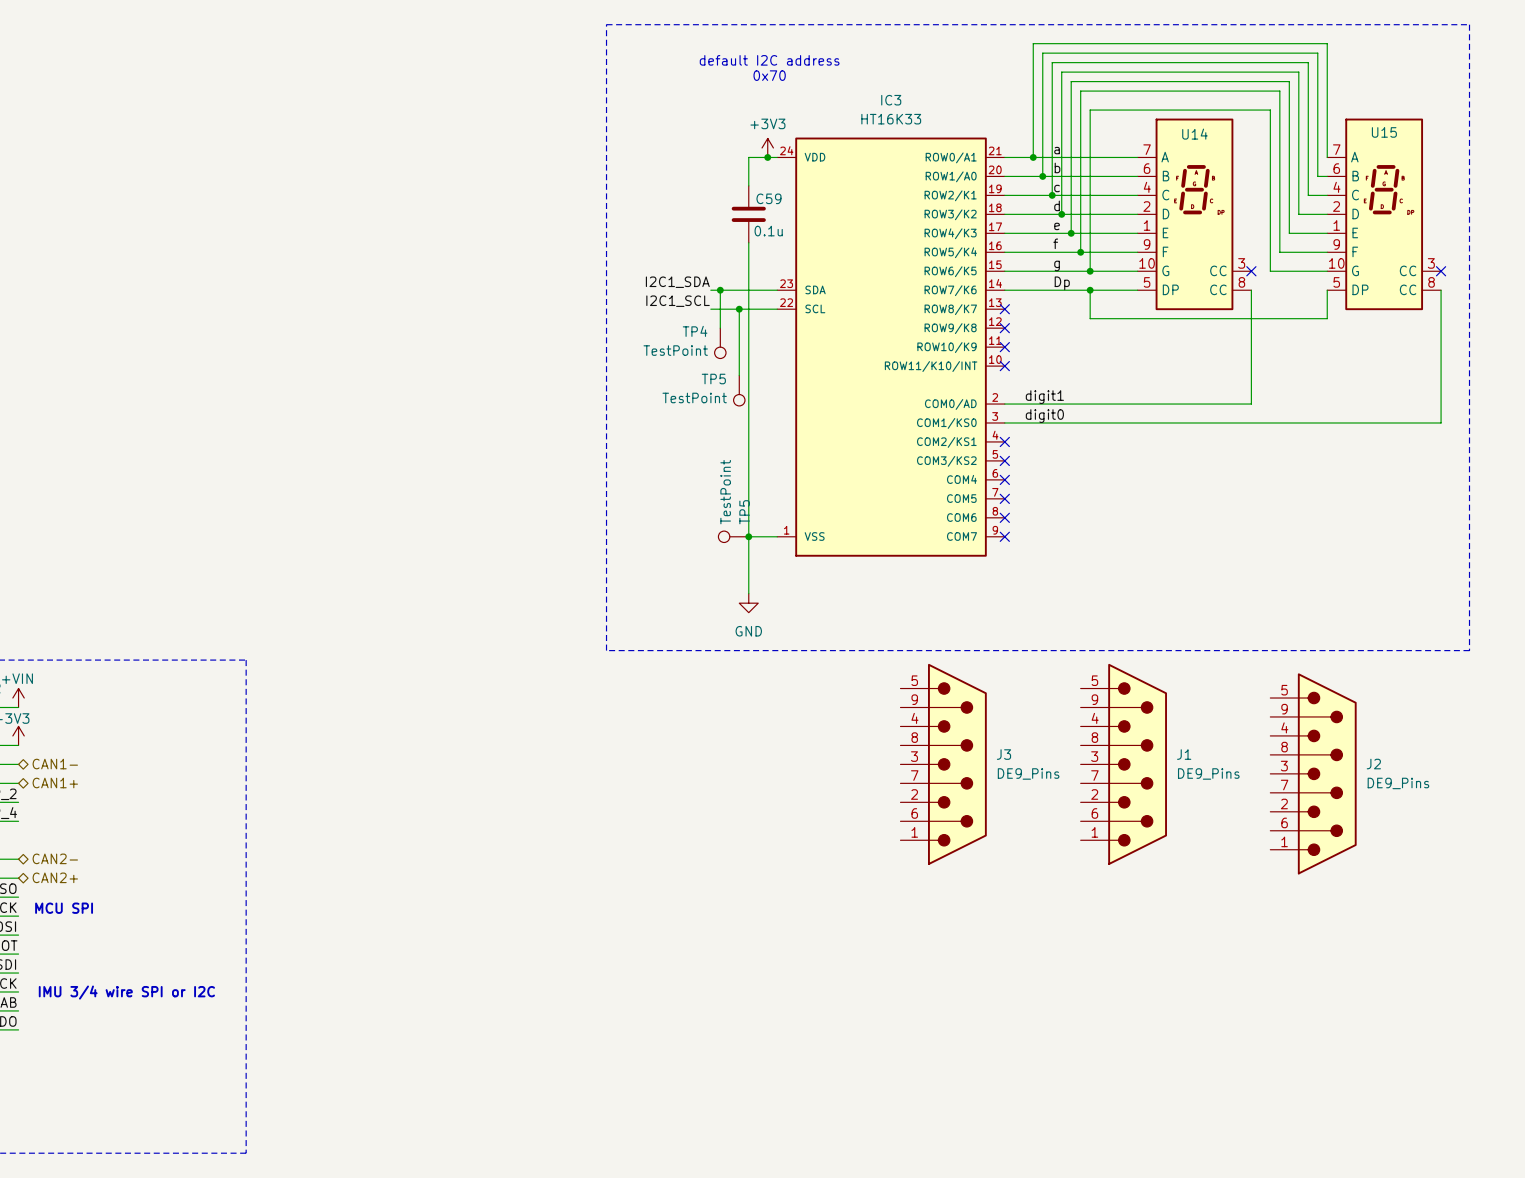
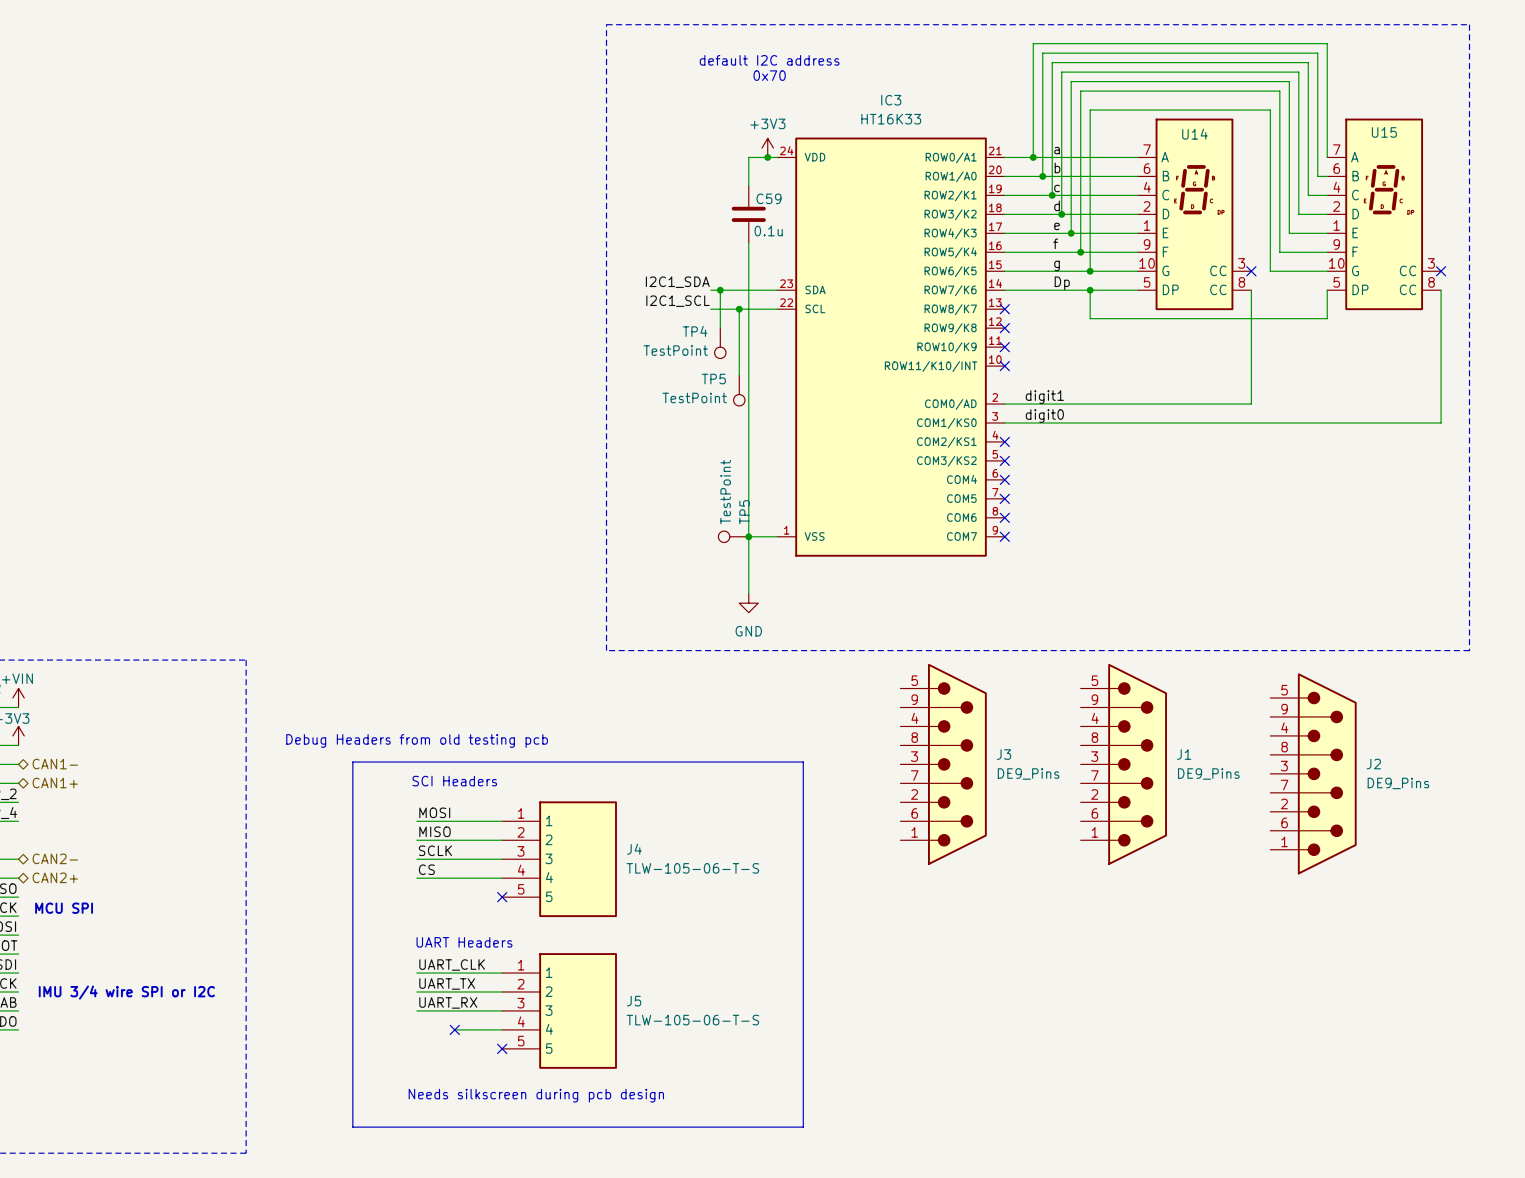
text: none -> Debug Headers from old testing pcb (417, 740)
line: none -> (352, 762) (803, 762) (803, 1127) (352, 1127) (352, 762)
text: none -> SCI Headers (454, 781)
label: none -> MOSI (434, 812)
wire: none -> (416, 821) (502, 821)
label: none -> MISO (434, 831)
wire: none -> (416, 840) (502, 840)
label: none -> SCLK (435, 850)
wire: none -> (416, 859) (502, 859)
J4: none -> TLW-105-06-T-S (559, 859)
label: none -> CS (426, 869)
wire: none -> (416, 878) (502, 878)
no-connect mark: none -> (502, 897)
text: none -> UART Headers (464, 942)
label: none -> UART_CLK (452, 965)
wire: none -> (416, 973) (502, 973)
label: none -> UART_TX (447, 983)
wire: none -> (416, 991) (502, 991)
label: none -> UART_RX (448, 1002)
wire: none -> (416, 1010) (502, 1010)
J5: none -> TLW-105-06-T-S (559, 1010)
wire: none -> (454, 1029) (502, 1029)
no-connect mark: none -> (454, 1029)
no-connect mark: none -> (502, 1048)
text: none -> Needs silkscreen during pcb design (536, 1095)

